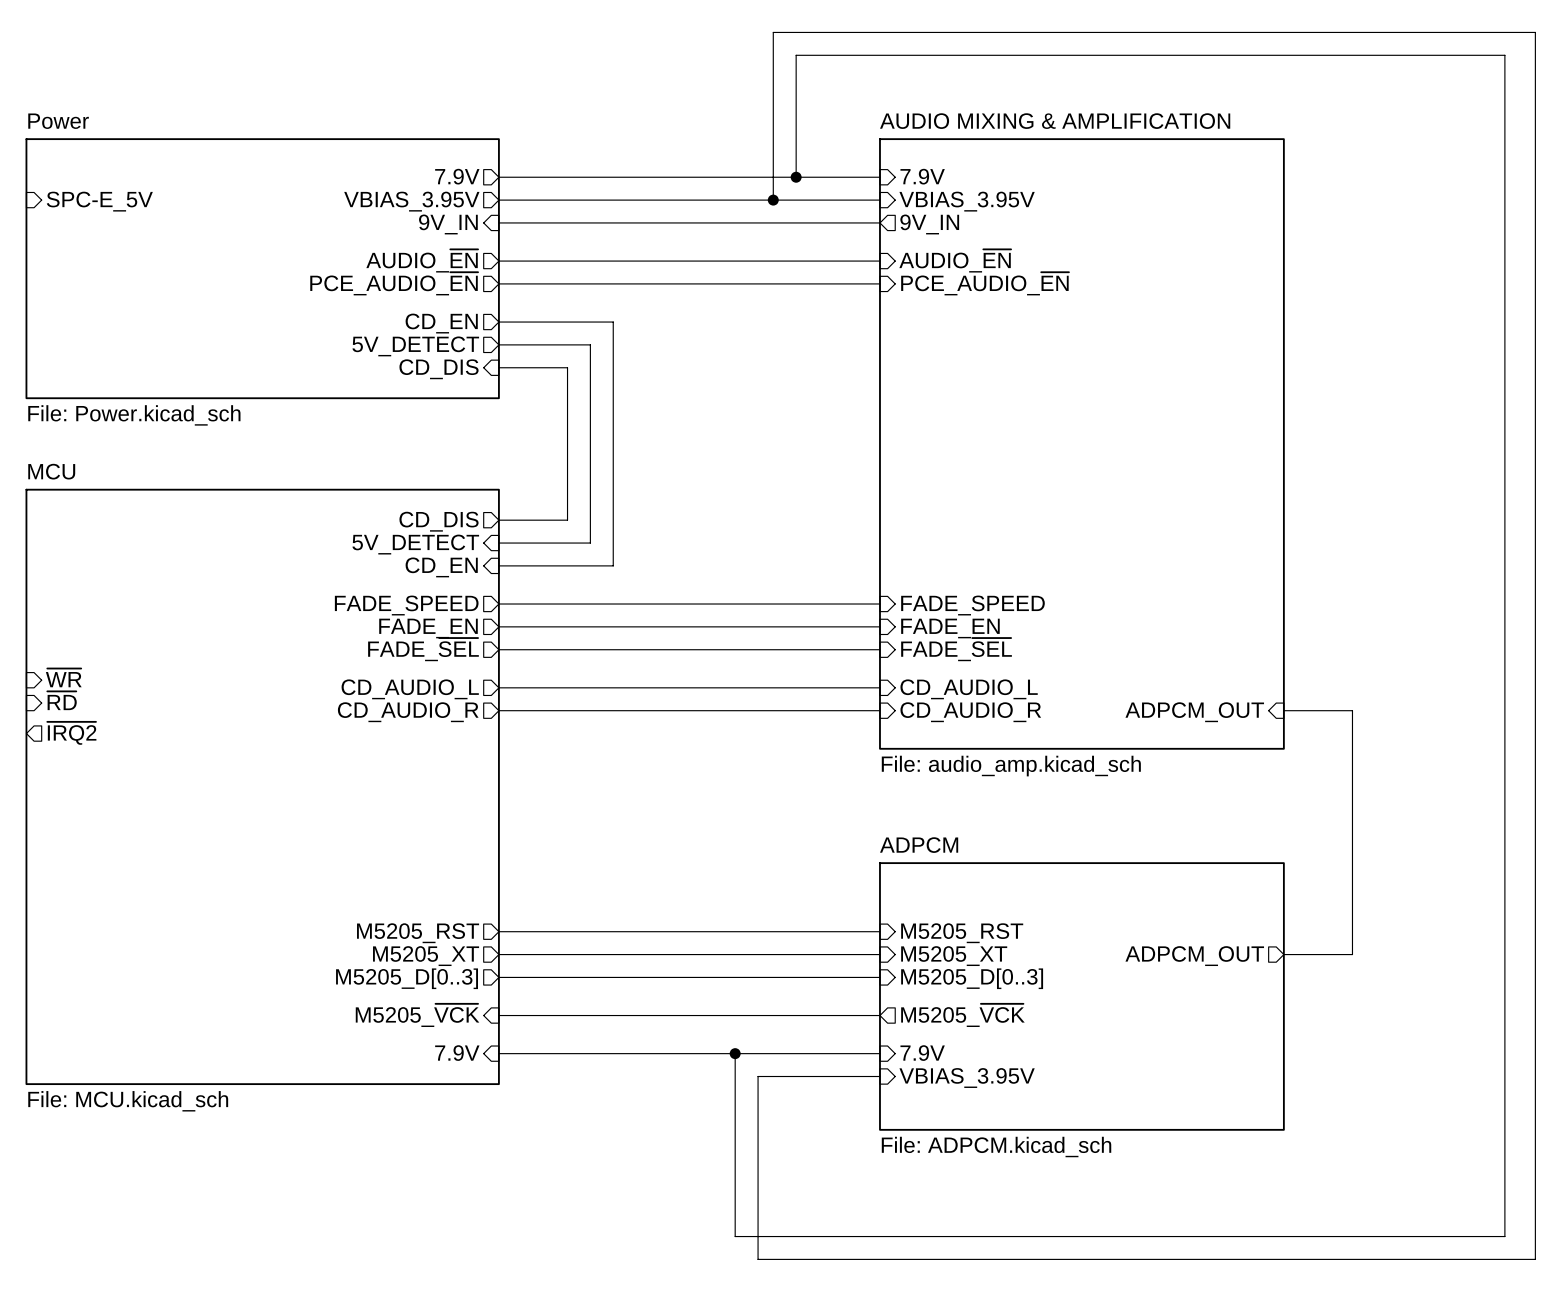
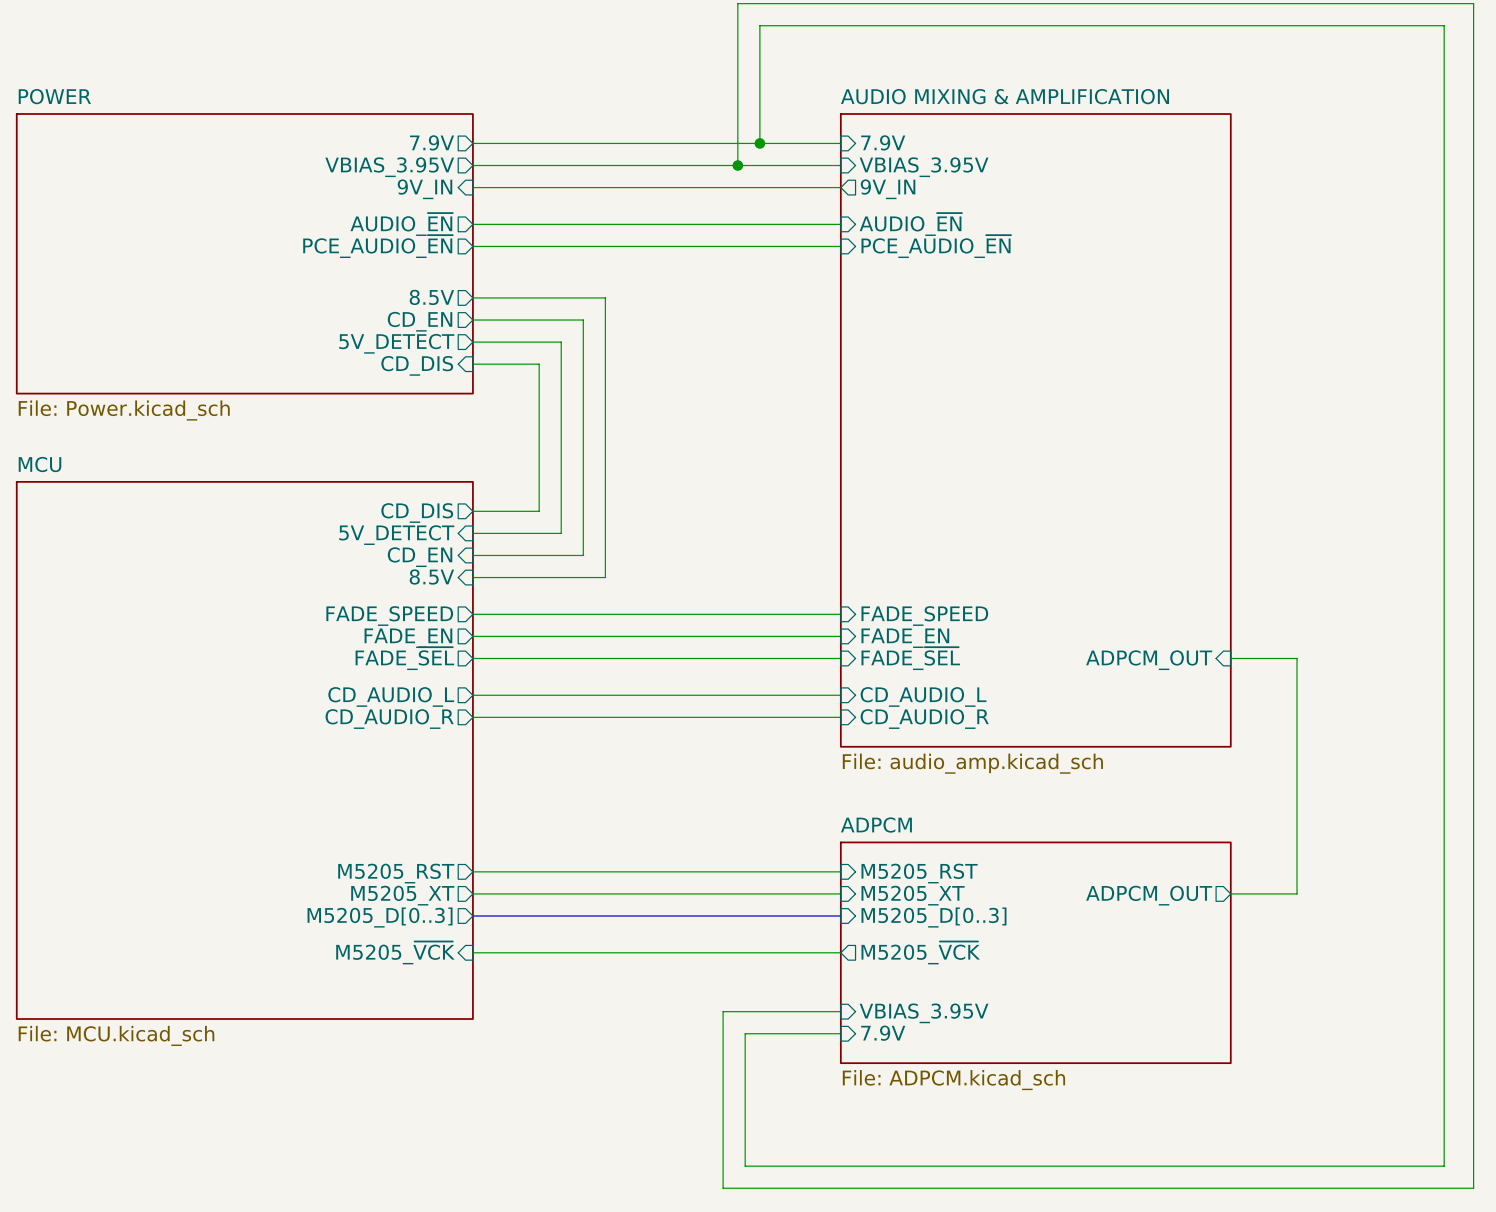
sheet pin: SPC-E_5V (99, 201) -> none
sheet Power: File: Power.kicad_sch (262, 268) -> none
sheet POWER: none -> File: Power.kicad_sch (244, 253)
wire: (498, 322) (613, 322) (613, 360) -> (472, 320) (583, 320)
sheet pin position: CD_EN (441, 323) -> CD_EN (420, 321)
sheet pin: none -> 8.5V (431, 297)
wire: (498, 344) (590, 344) (590, 383) -> (472, 342) (561, 342)
sheet pin position: 5V_DETECT (415, 346) -> 5V_DETECT (396, 343)
wire: (498, 367) (567, 367) (567, 405) -> (472, 364) (539, 364)
sheet pin position: CD_DIS (439, 369) -> CD_DIS (417, 365)
sheet AUDIO MIXING & AMPLIFICATION: File: audio_amp.kicad_sch (1081, 443) -> none
sheet AUDIO MIXING & AMPLIFICATION: none -> File: audio_amp.kicad_sch (1035, 430)
wire: (498, 520) (567, 520) -> (472, 511) (539, 511) (539, 474)
sheet pin position: CD_DIS (439, 521) -> CD_DIS (417, 513)
wire: (498, 543) (590, 543) -> (472, 533) (561, 533) (561, 496)
sheet pin position: 5V_DETECT (415, 544) -> 5V_DETECT (396, 535)
wire: (498, 565) (613, 565) -> (583, 555) (583, 518)
sheet pin: CD_EN (441, 567) -> none
wire: (613, 604) (879, 604) -> none
sheet pin shape: output (406, 605) -> input (420, 557)
sheet pin: FADE_SPEED (406, 605) -> CD_EN (420, 557)
sheet pin position: FADE_SPEED (972, 605) -> FADE_SPEED (924, 616)
wire: (636, 626) (879, 626) -> (605, 577) (605, 297) (472, 297)
sheet pin shape: output (428, 628) -> input (431, 577)
sheet pin: FADE_EN (428, 628) -> 8.5V (431, 577)
sheet pin: FADE_EN (950, 628) -> none
sheet pin: FADE_~{SEL} (423, 649) -> FADE_SPEED (389, 616)
wire: (498, 649) (879, 649) -> (472, 614) (840, 614)
sheet pin: FADE_~{SEL} (956, 649) -> none
sheet pin: ~{WR} (63, 677) -> none
sheet pin: CD_AUDIO_L (410, 689) -> FADE_EN (408, 638)
sheet pin: CD_AUDIO_L (969, 689) -> FADE_EN (905, 638)
sheet pin: ~{RD} (62, 700) -> none
sheet pin: CD_AUDIO_R (408, 712) -> FADE_~{SEL} (404, 658)
sheet pin: CD_AUDIO_R (970, 712) -> FADE_~{SEL} (910, 658)
sheet pin: ~{IRQ2} (71, 733) -> none
wire: none -> (472, 695) (840, 695)
sheet pin: none -> CD_AUDIO_L (391, 696)
sheet pin: none -> CD_AUDIO_L (923, 696)
sheet pin: none -> CD_AUDIO_R (389, 719)
sheet pin: none -> CD_AUDIO_R (924, 719)
sheet MCU: File: MCU.kicad_sch (262, 786) -> none
sheet MCU: none -> File: MCU.kicad_sch (244, 750)
sheet ADPCM: File: ADPCM.kicad_sch (1081, 996) -> none
sheet ADPCM: none -> File: ADPCM.kicad_sch (1035, 952)
sheet pin: 7.9V (457, 1053) -> none
wire: (498, 1053) (879, 1053) -> (472, 717) (840, 717)
wire: (735, 1053) (735, 1236) (780, 1236) -> (840, 1033) (745, 1033) (745, 1166)
junction: (735, 1053) -> none
sheet pin position: 7.9V (922, 1053) -> 7.9V (883, 1033)

